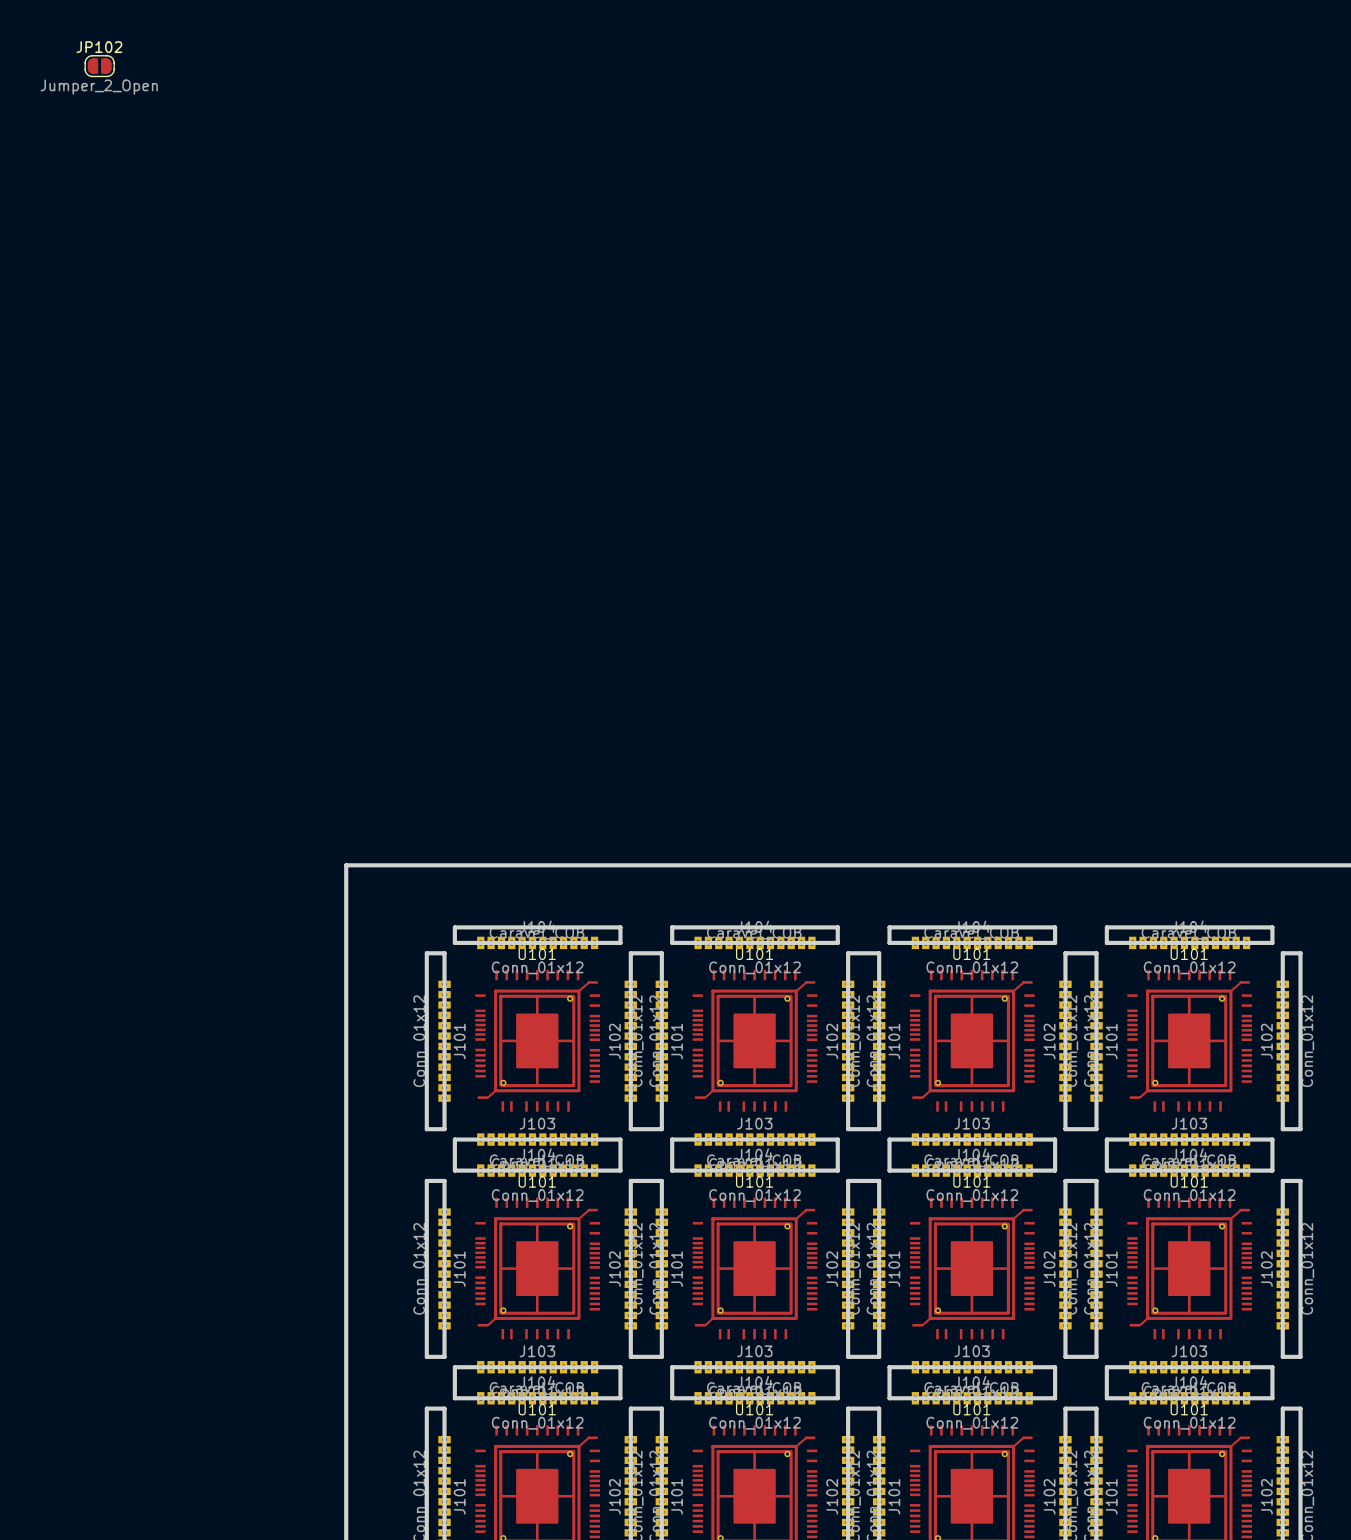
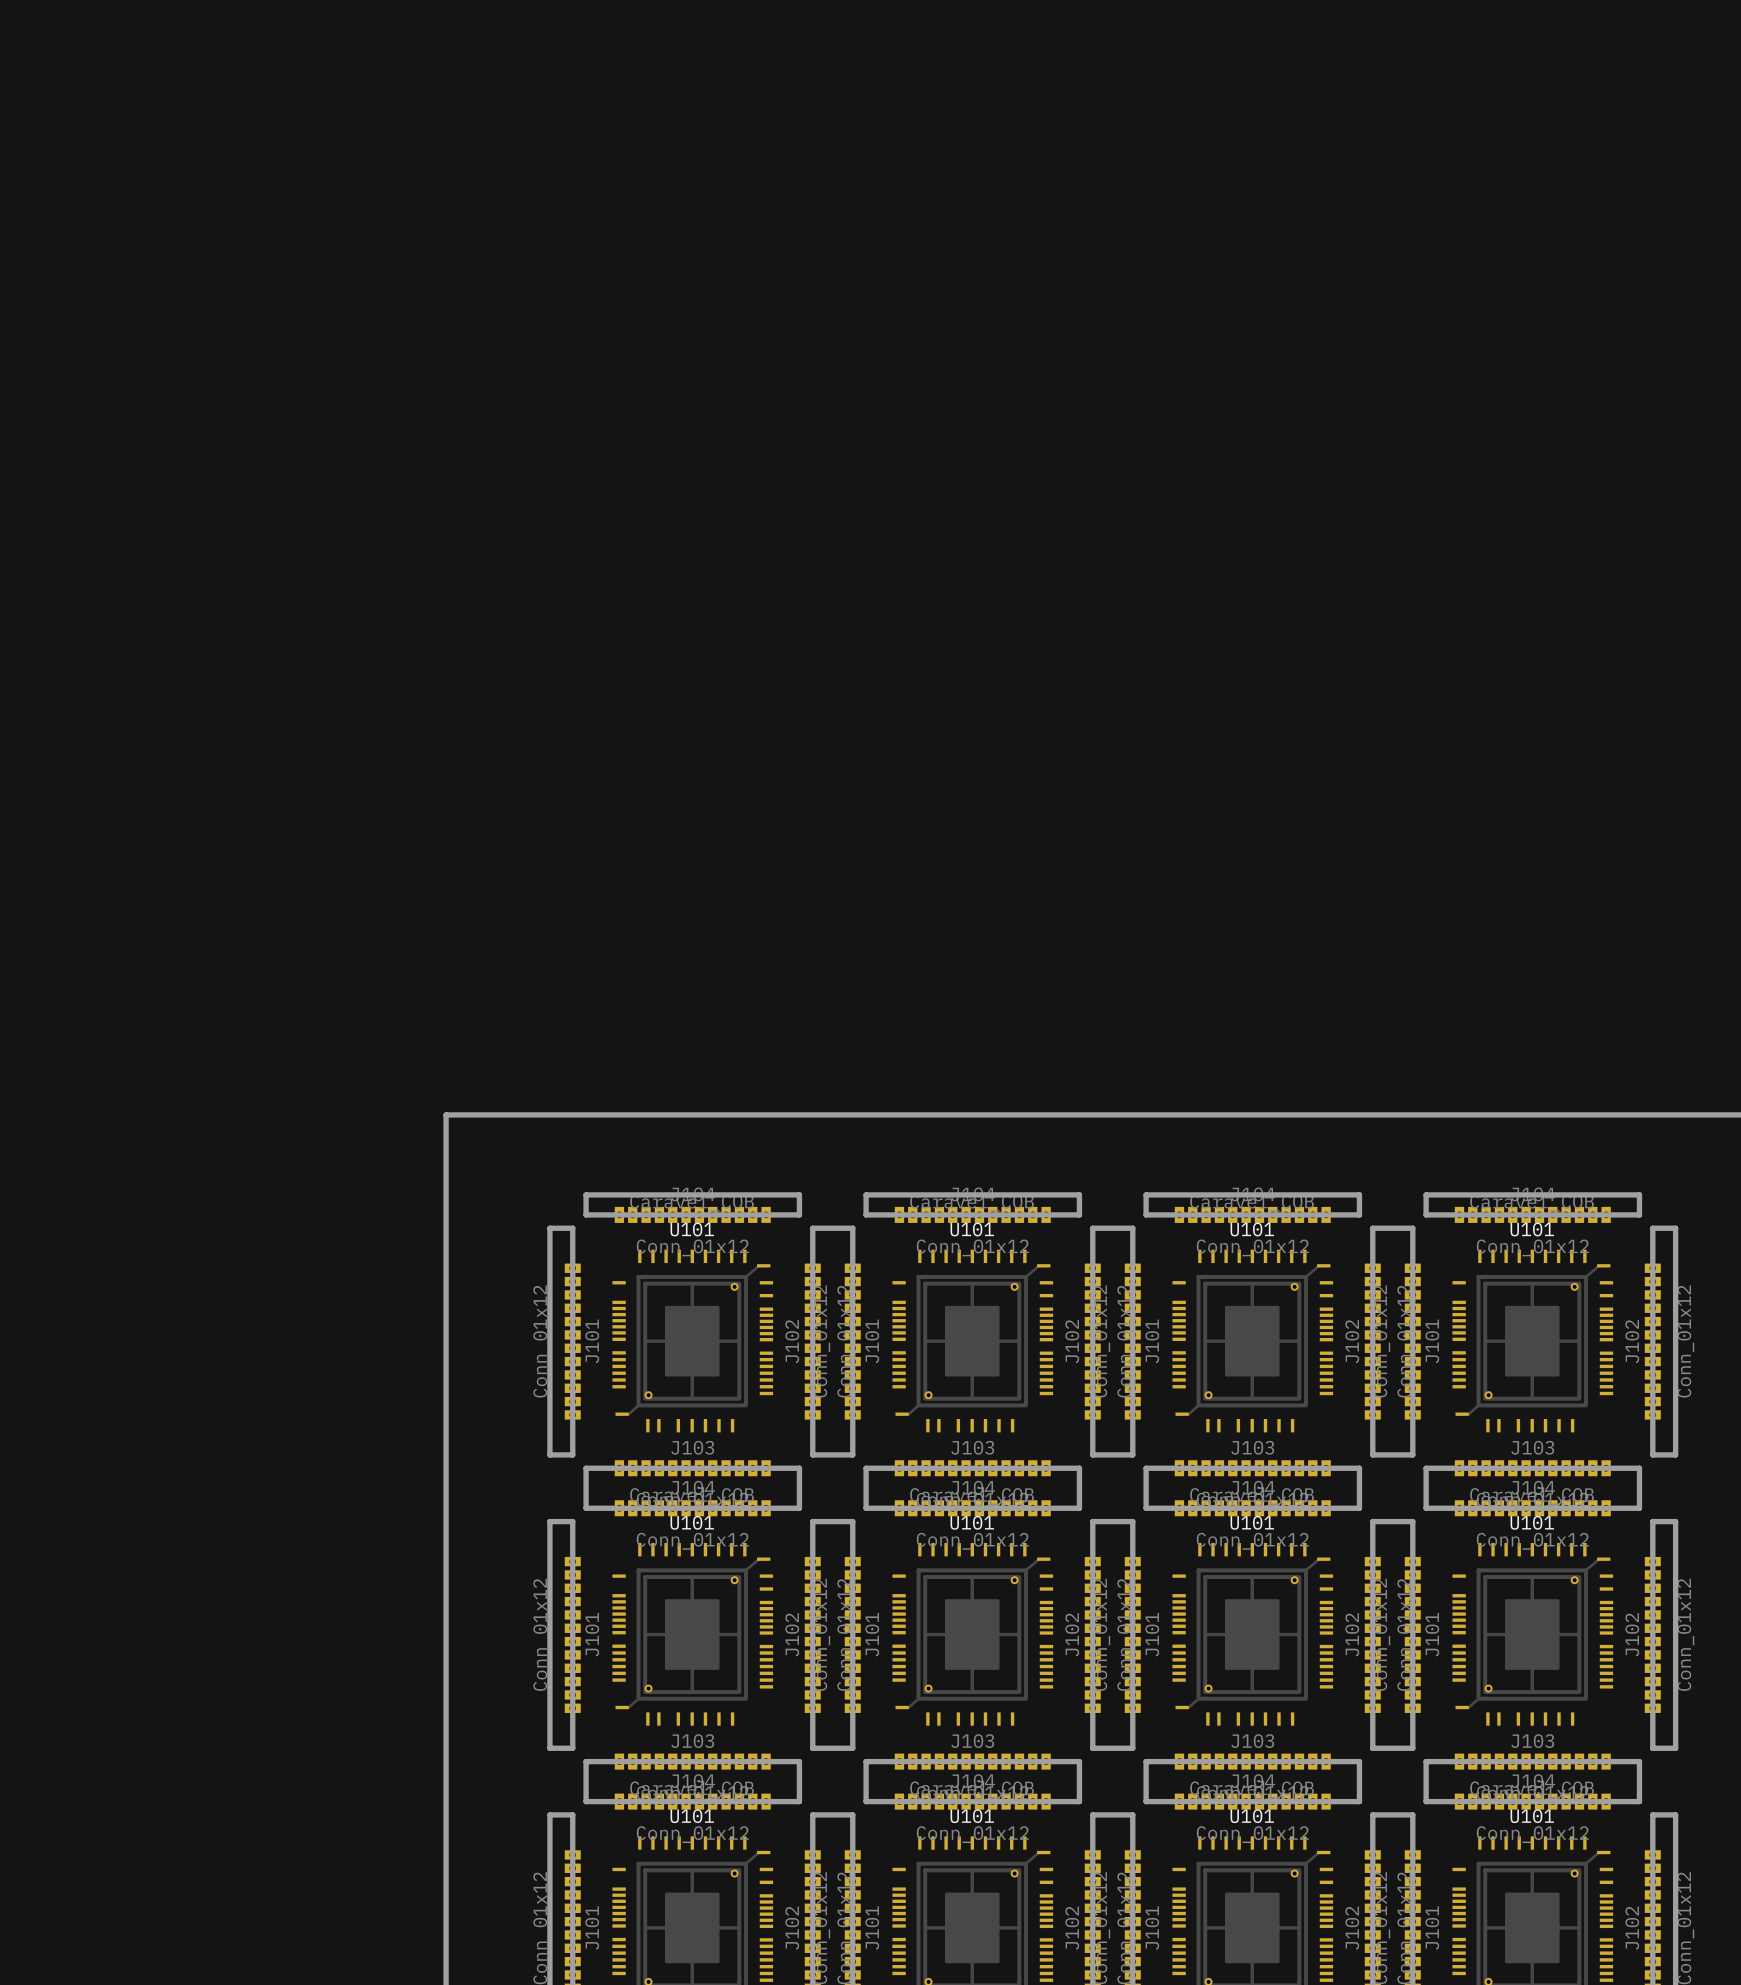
JP102: Jumper_2_Open (99, 66) -> none

